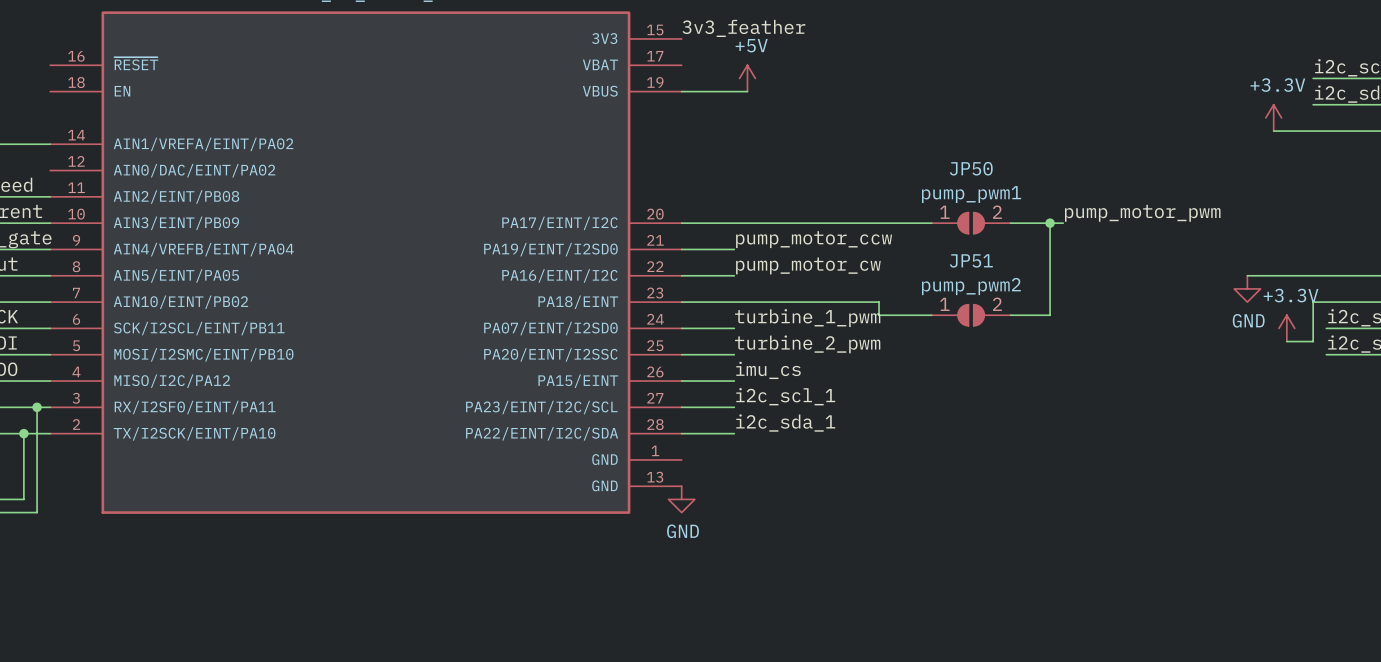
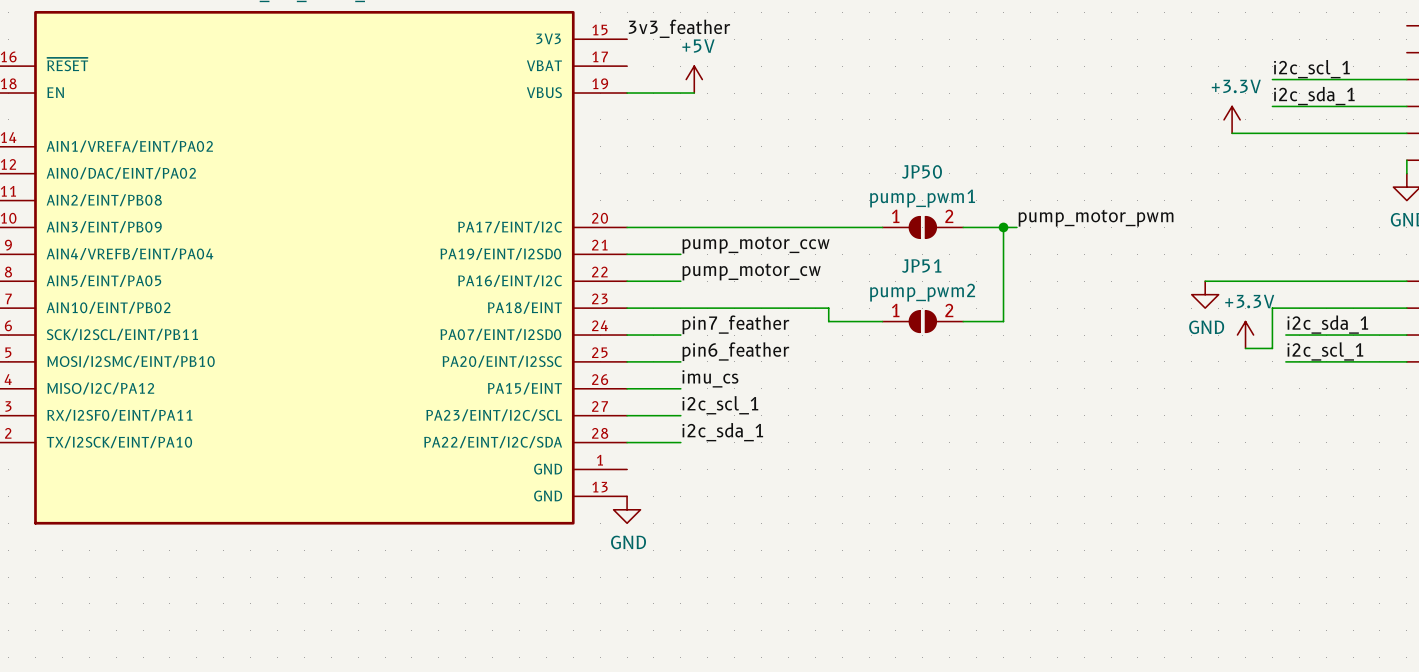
label: turbine_1_pwm (807, 318) -> pin7_feather (735, 324)
label: turbine_2_pwm (807, 344) -> pin6_feather (735, 351)

